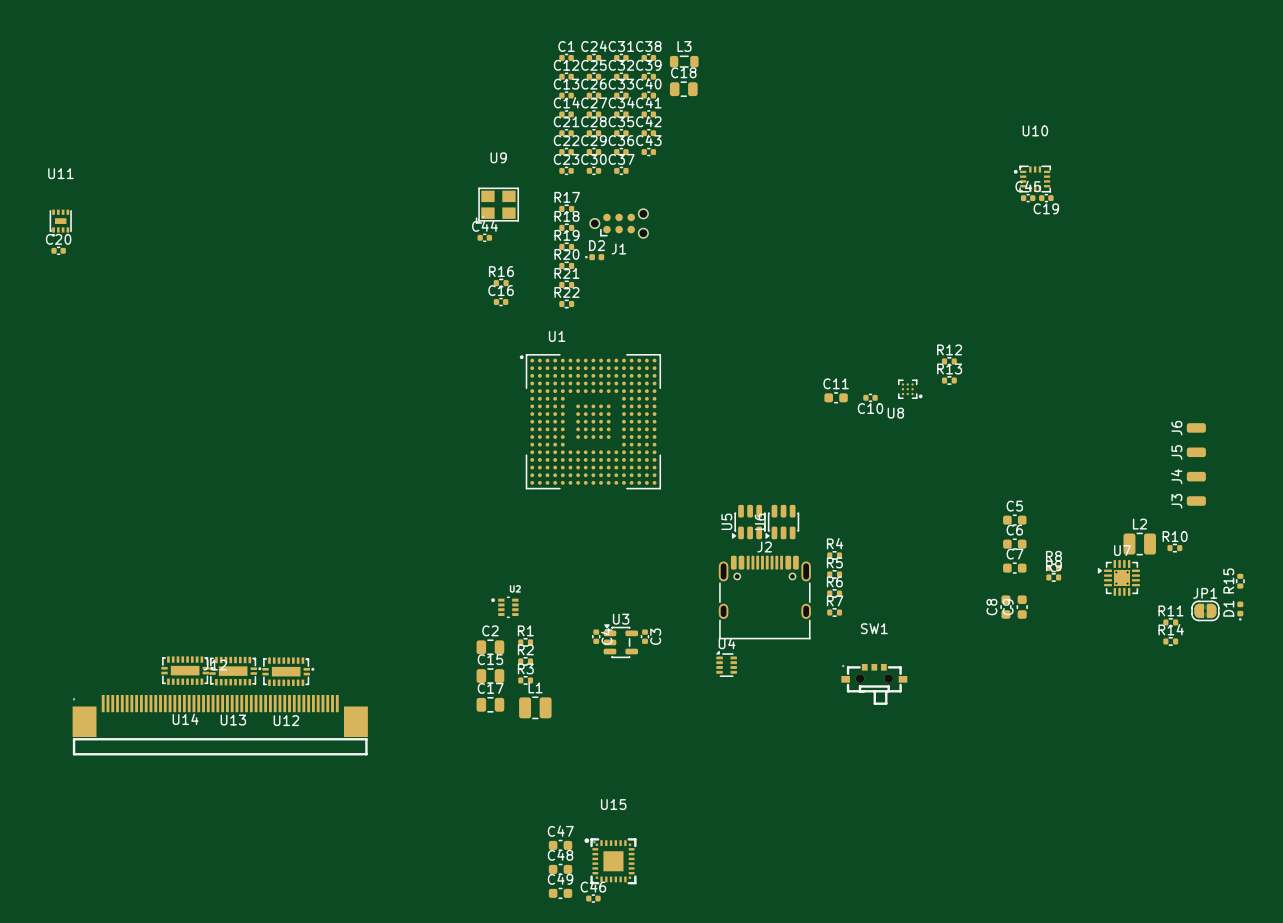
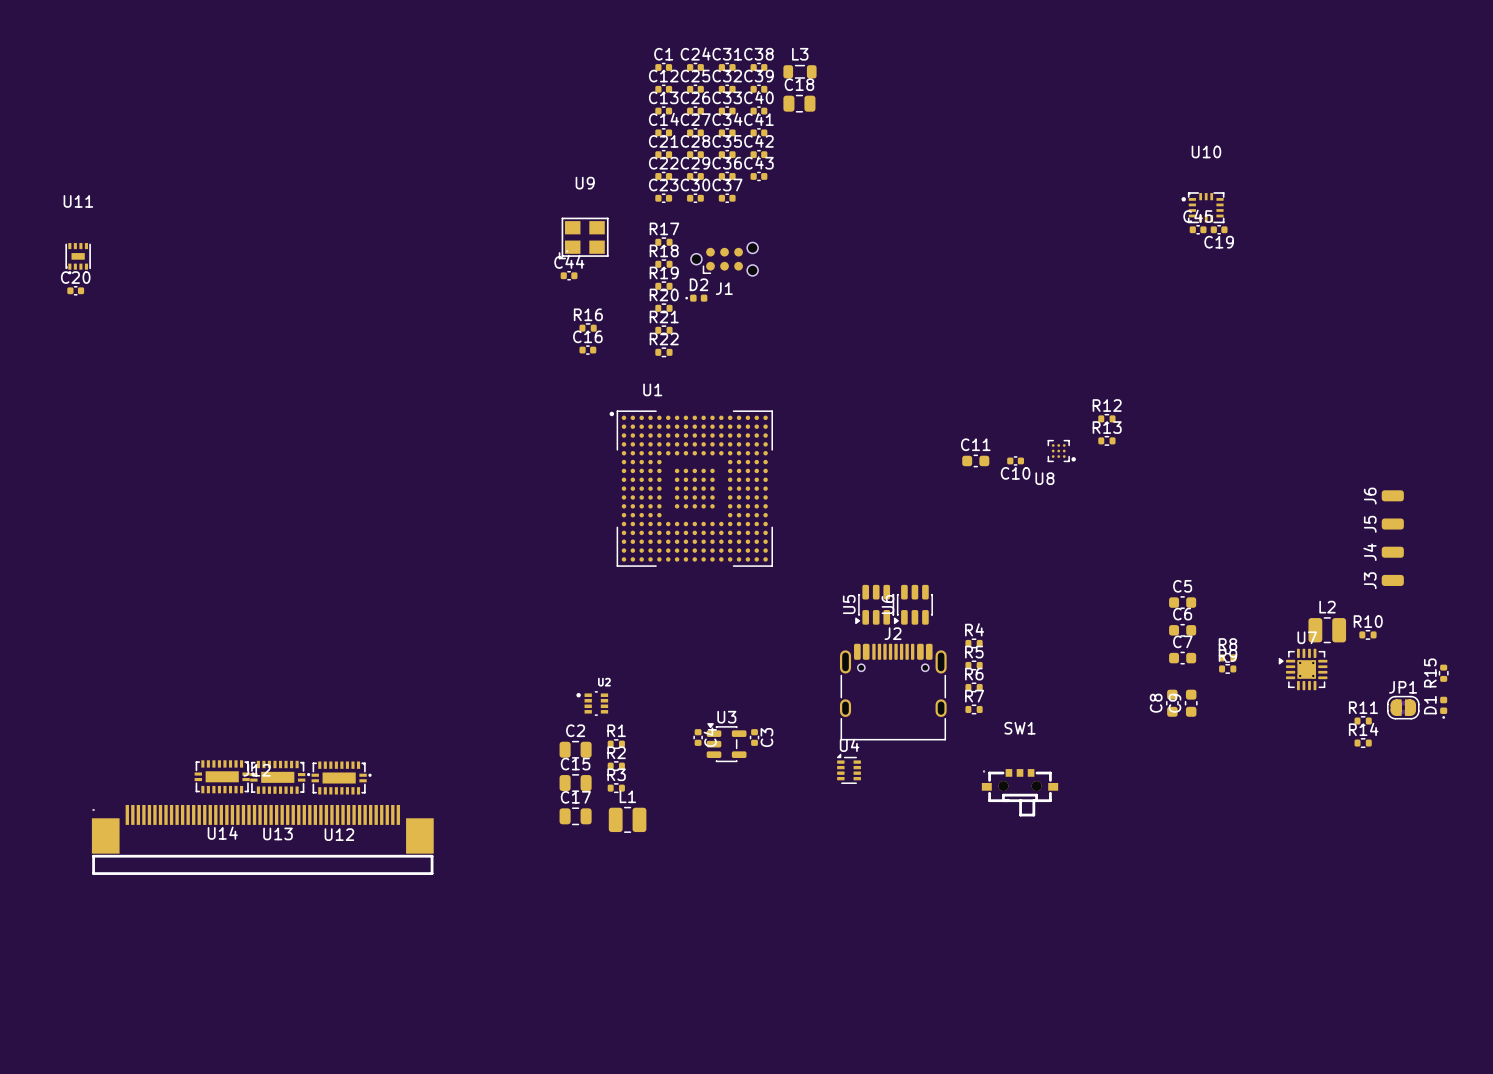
C47: (560, 845) -> none
U15: (610, 861) -> none
C48: (560, 869) -> none
C49: (560, 893) -> none
C46: (593, 898) -> none

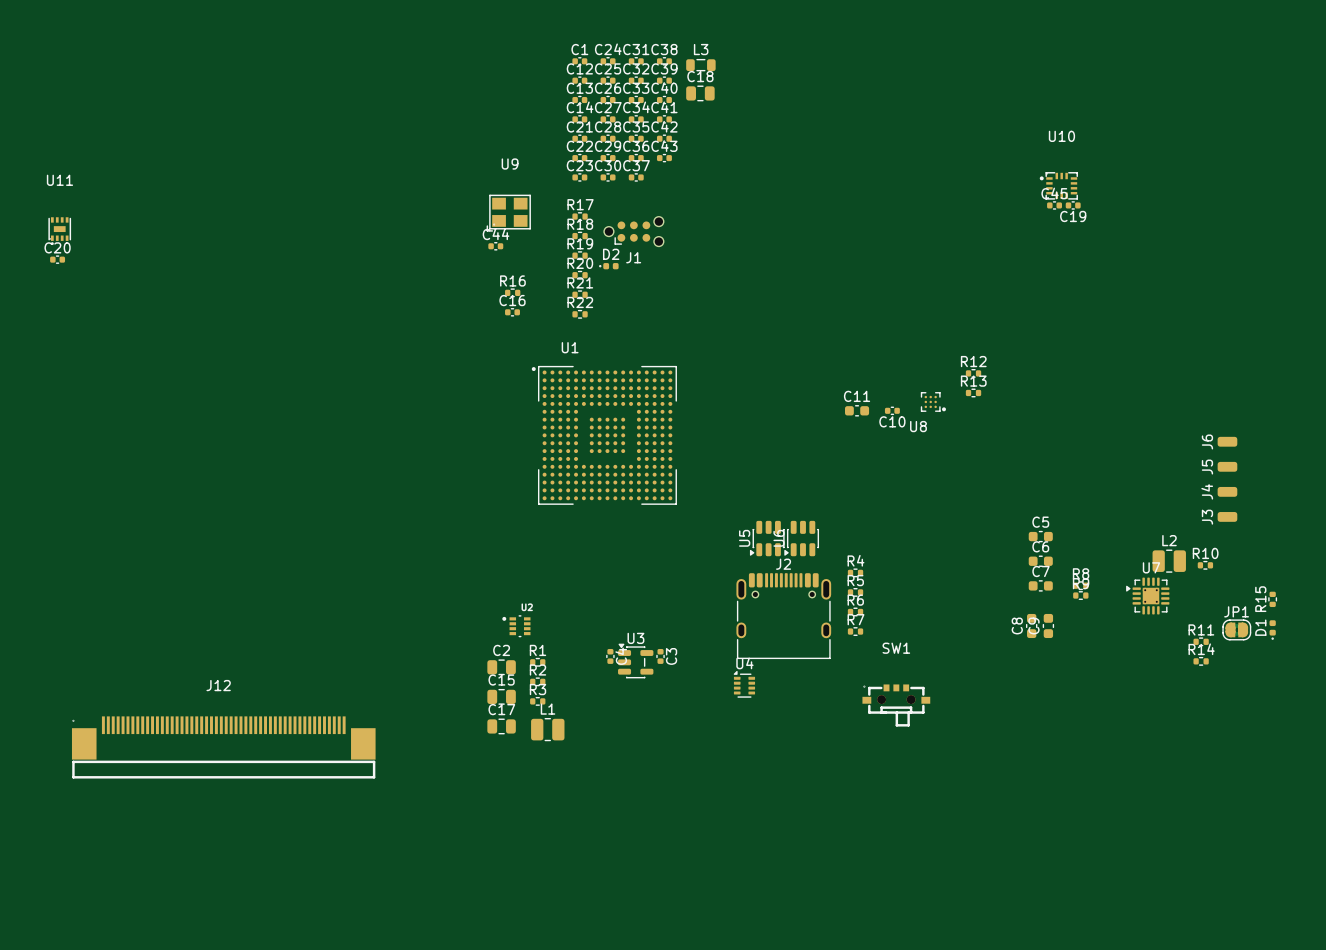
U14: (224, 776) -> none
U13: (280, 777) -> none
U12: (341, 778) -> none

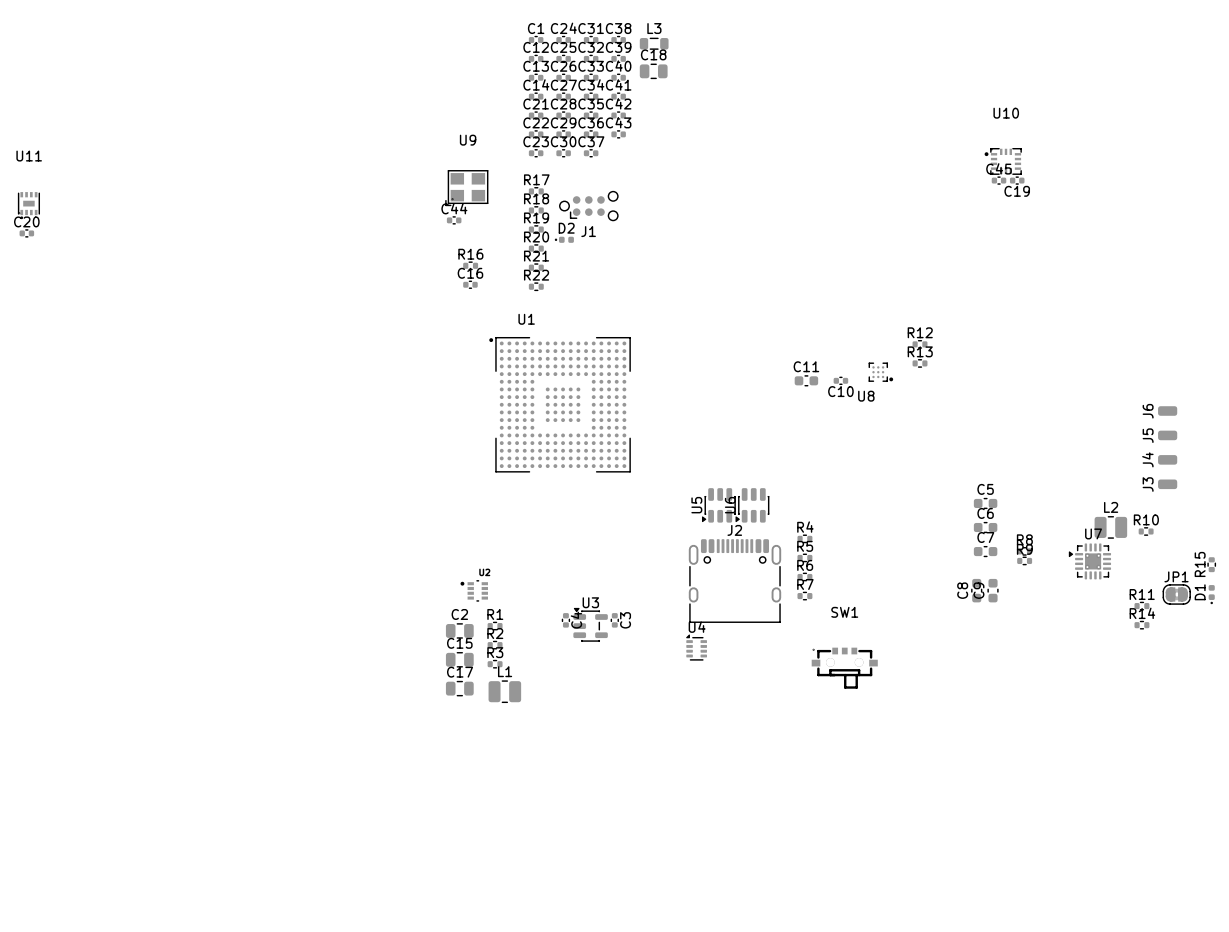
J12: (223, 747) -> none

